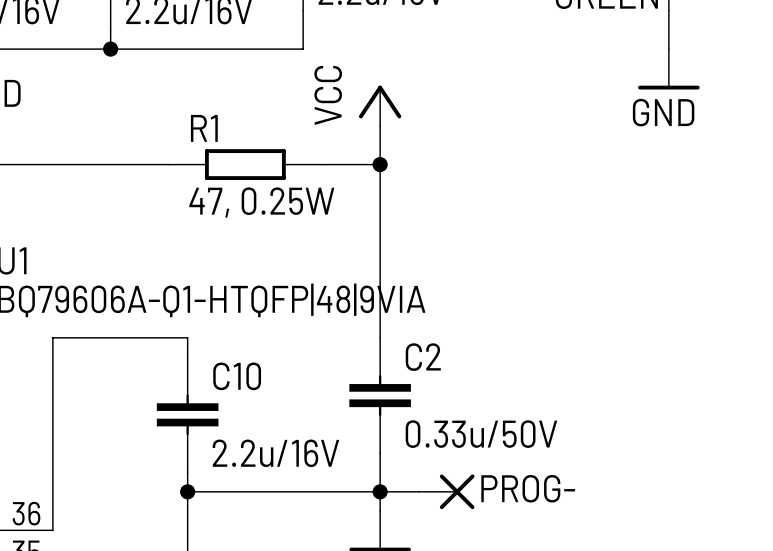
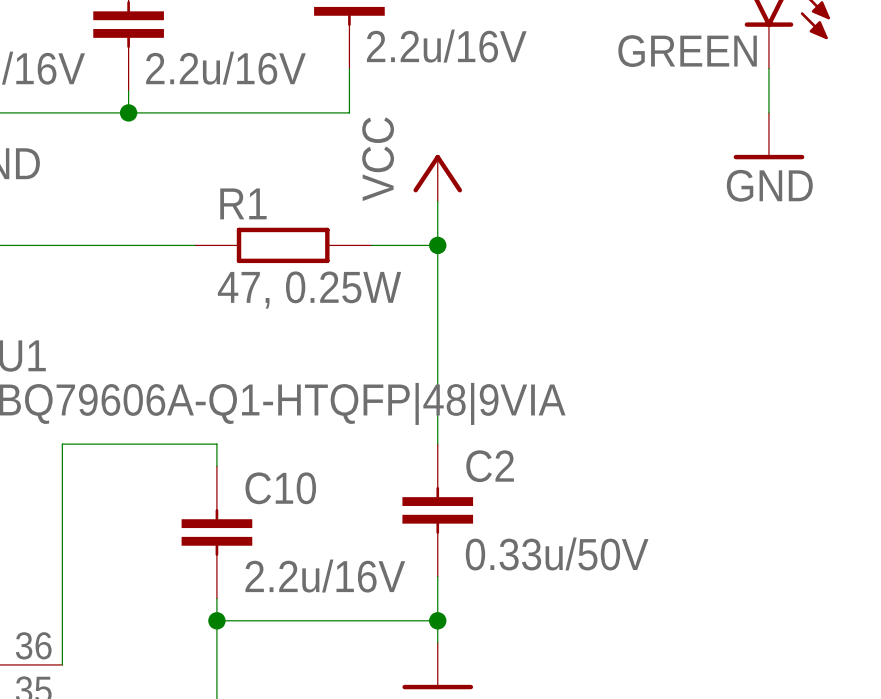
wire: (380, 491) (418, 491) -> none
PROG-: (446, 491) -> none

